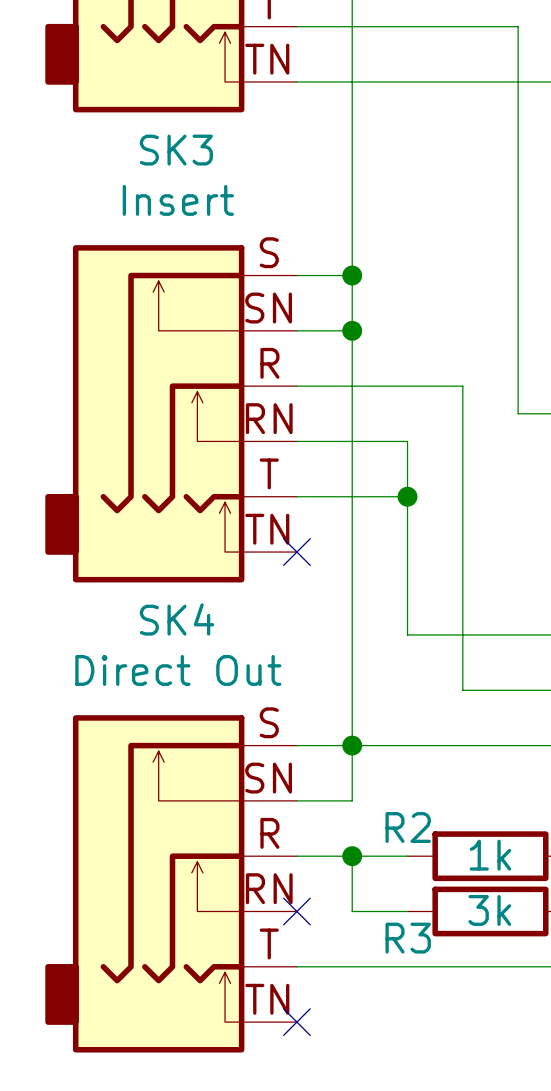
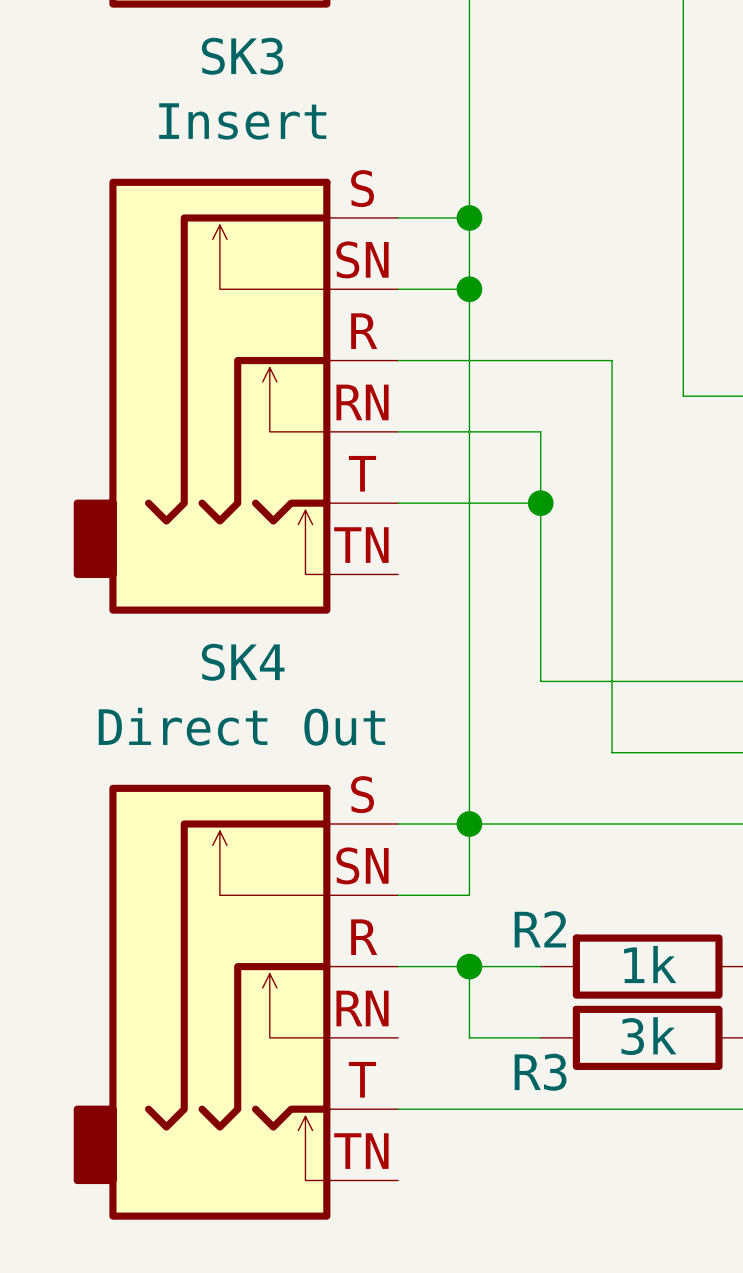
no-connect mark: (296, 552) -> none
no-connect mark: (296, 911) -> none
no-connect mark: (296, 1022) -> none

